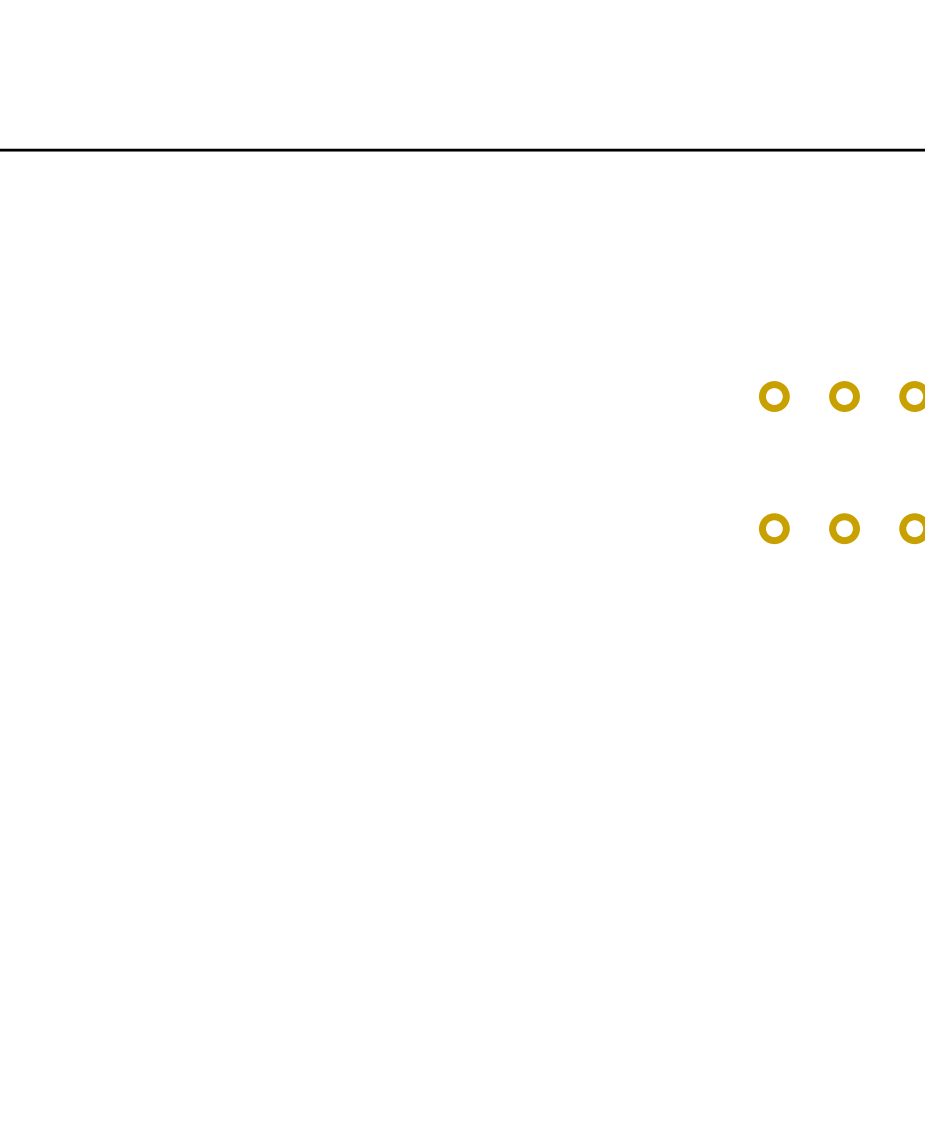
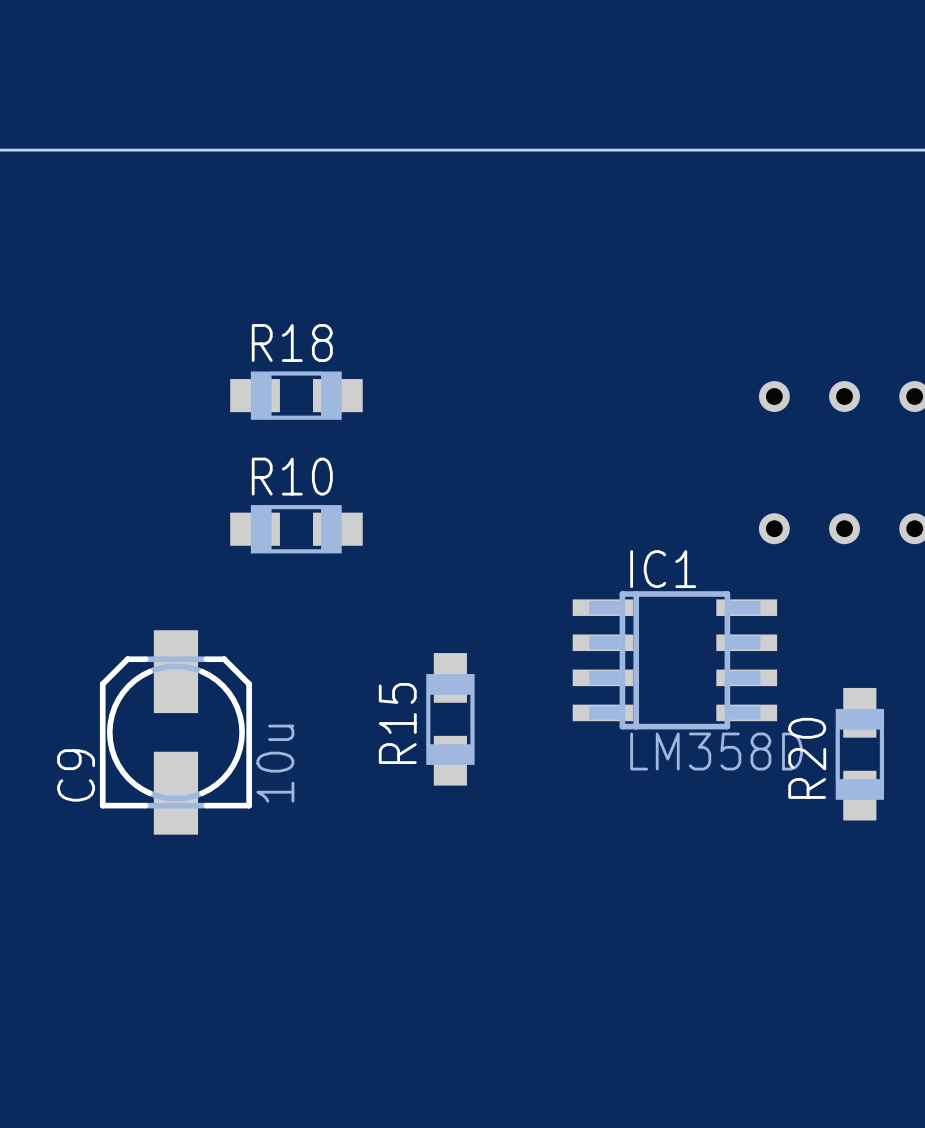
R18: none -> (296, 395)
R10: none -> (296, 529)
IC1: none -> LM358D (674, 660)
R15: none -> (450, 719)
C9: none -> 10u (175, 732)
R20: none -> (859, 754)

